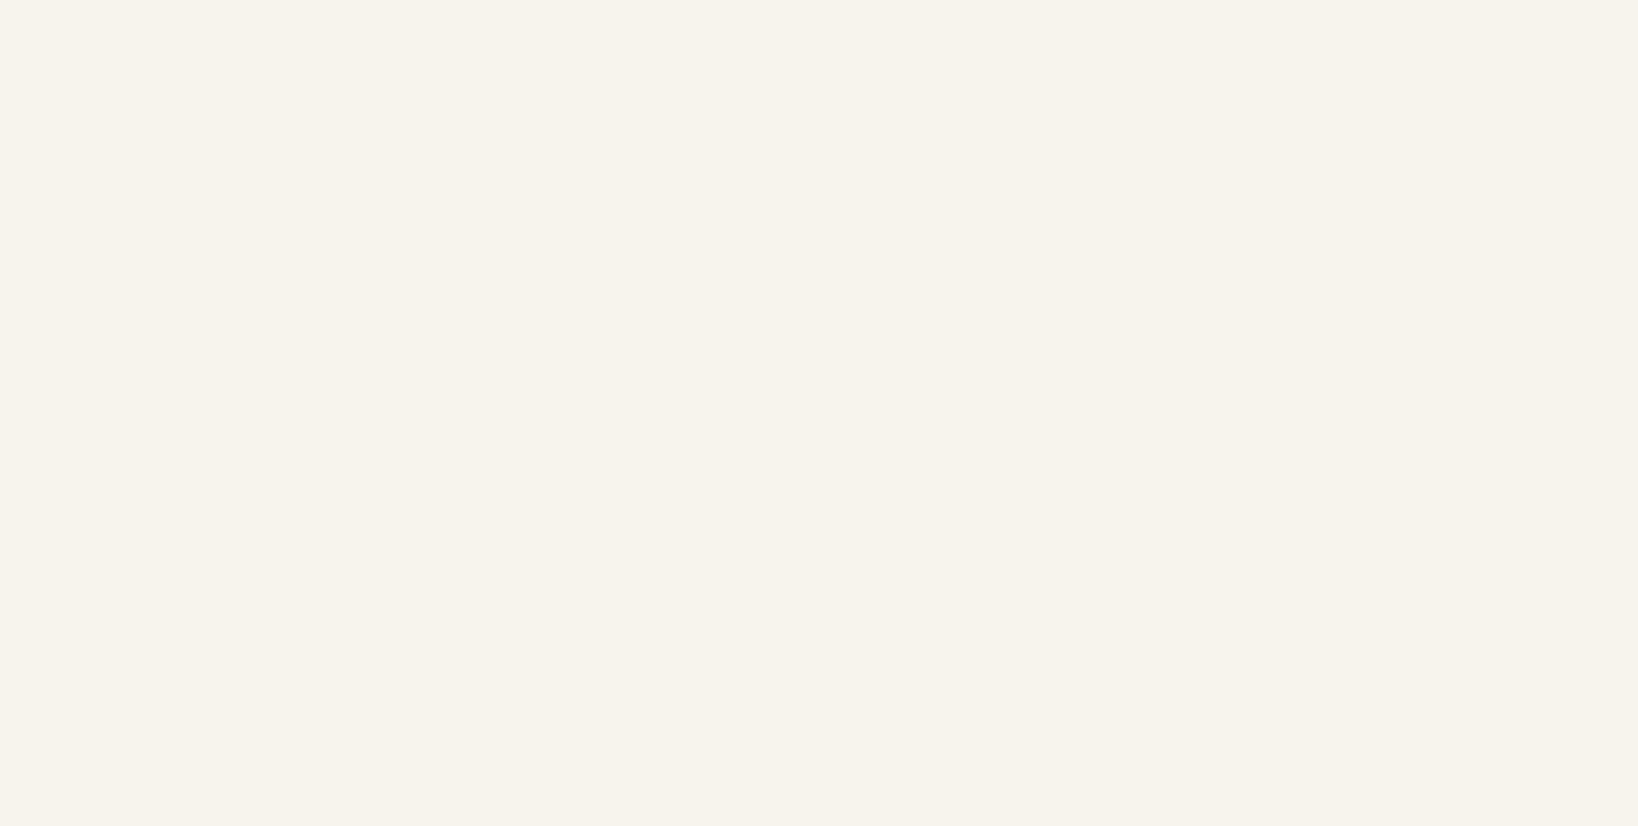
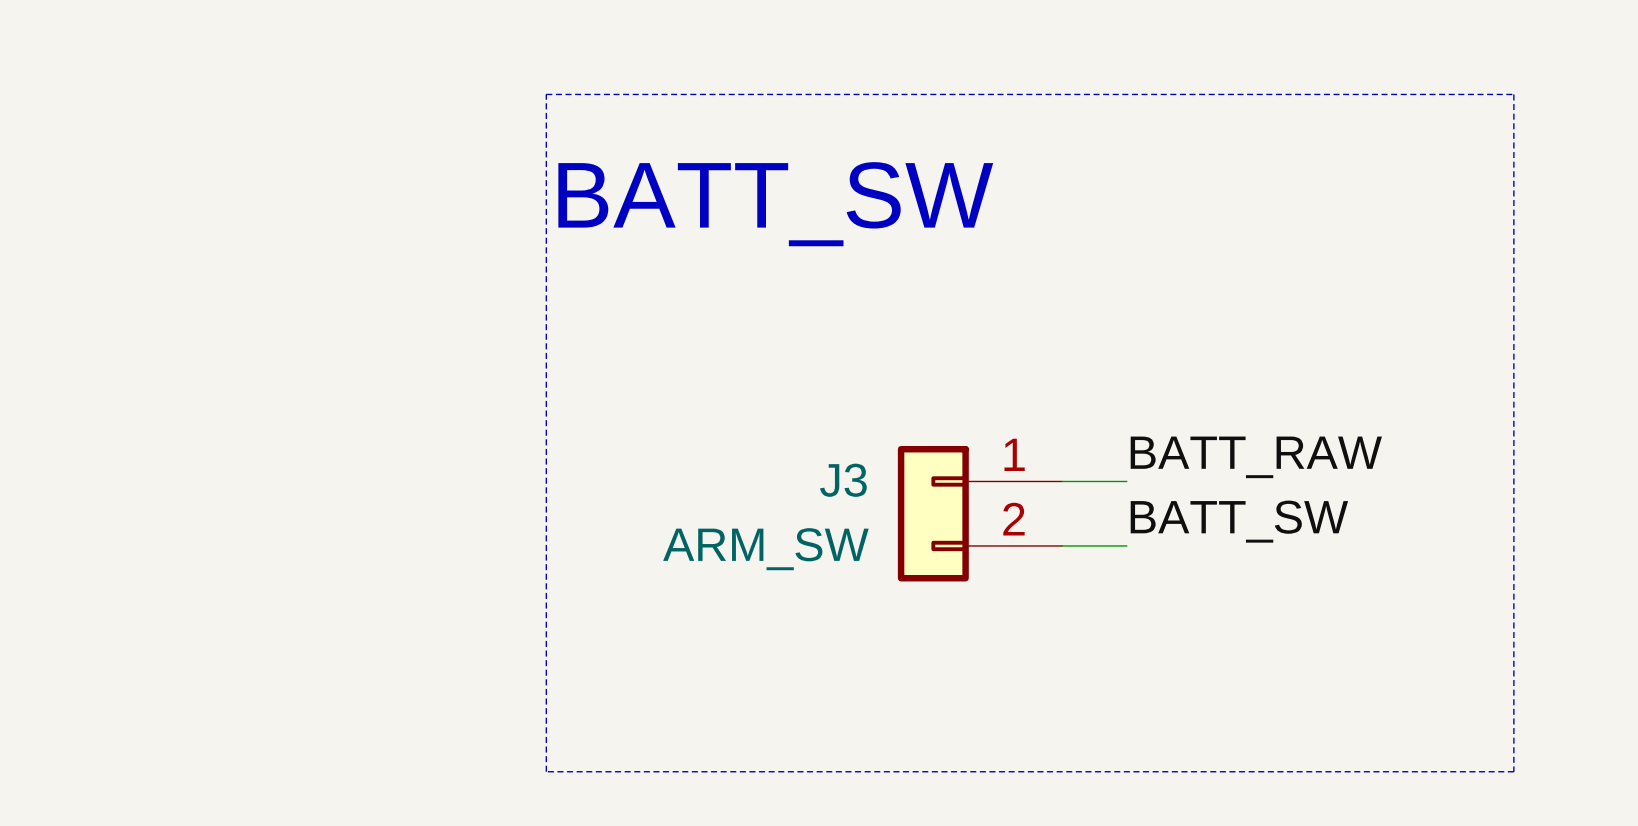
line: none -> (546, 94) (546, 771) (1513, 771) (1513, 94) (546, 94)
text: none -> BATT_SW (775, 204)
label: none -> BATT_RAW (1256, 457)
wire: none -> (1062, 481) (1126, 481)
J3: none -> ARM_SW (980, 513)
label: none -> BATT_SW (1239, 521)
wire: none -> (1062, 545) (1126, 545)

